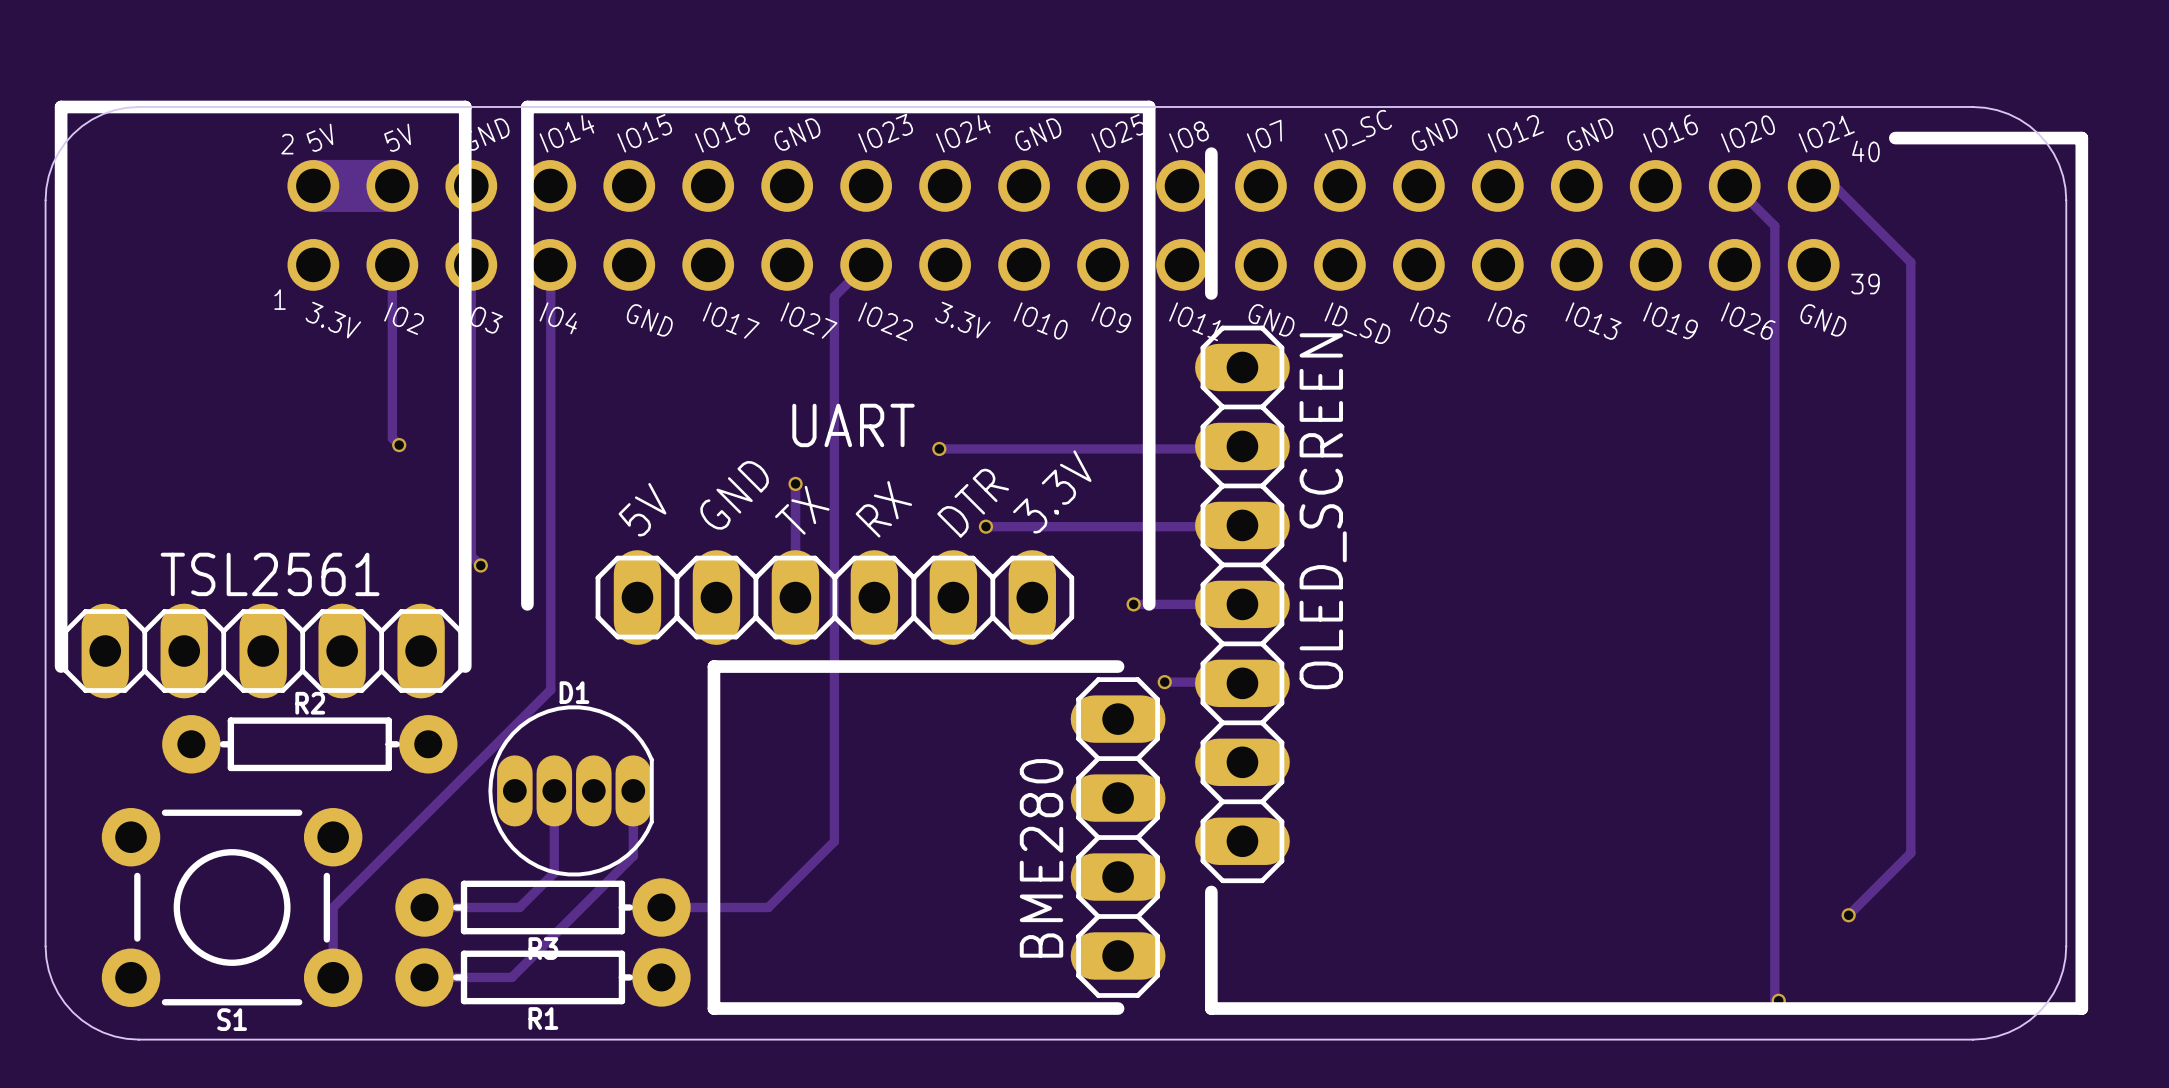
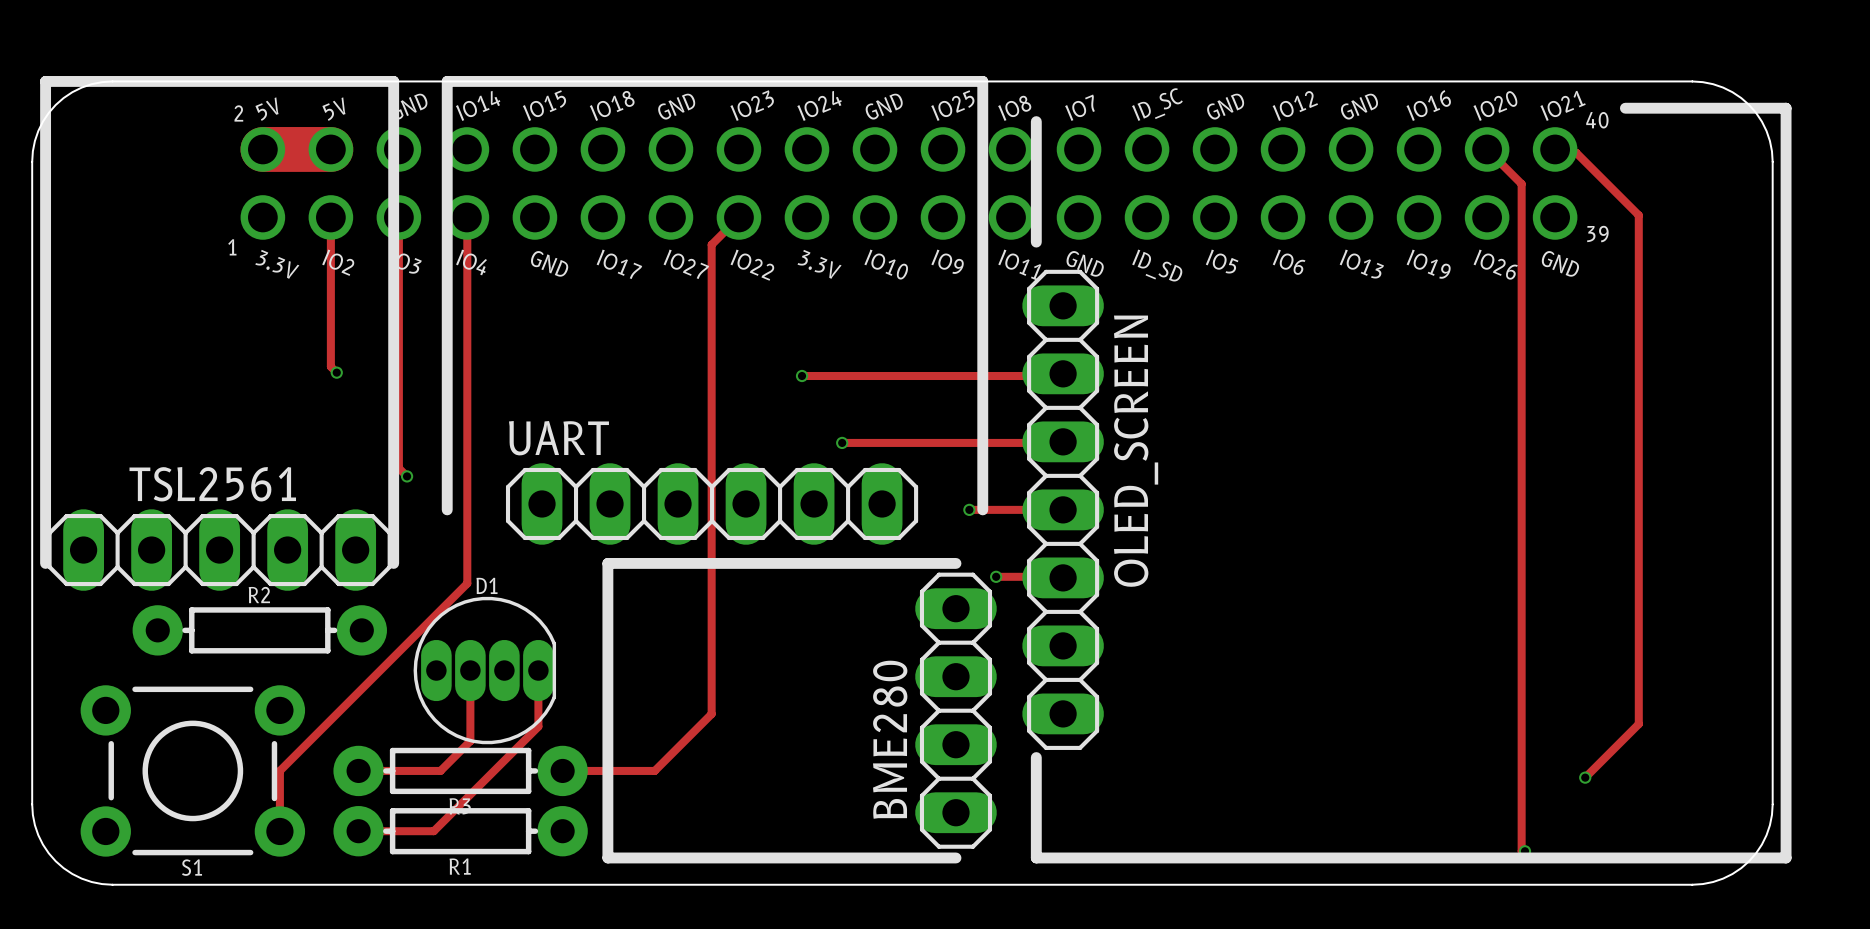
UART name position: UART (853, 425) -> UART (558, 438)
track: (795, 483) (795, 597) -> none
via: (795, 483) -> none
text: 3.3V (1052, 491) -> none
text: GND (734, 495) -> none
text: DTR (973, 503) -> none
text: 5V (642, 509) -> none
text: RX (883, 509) -> none
text: TX (802, 510) -> none

